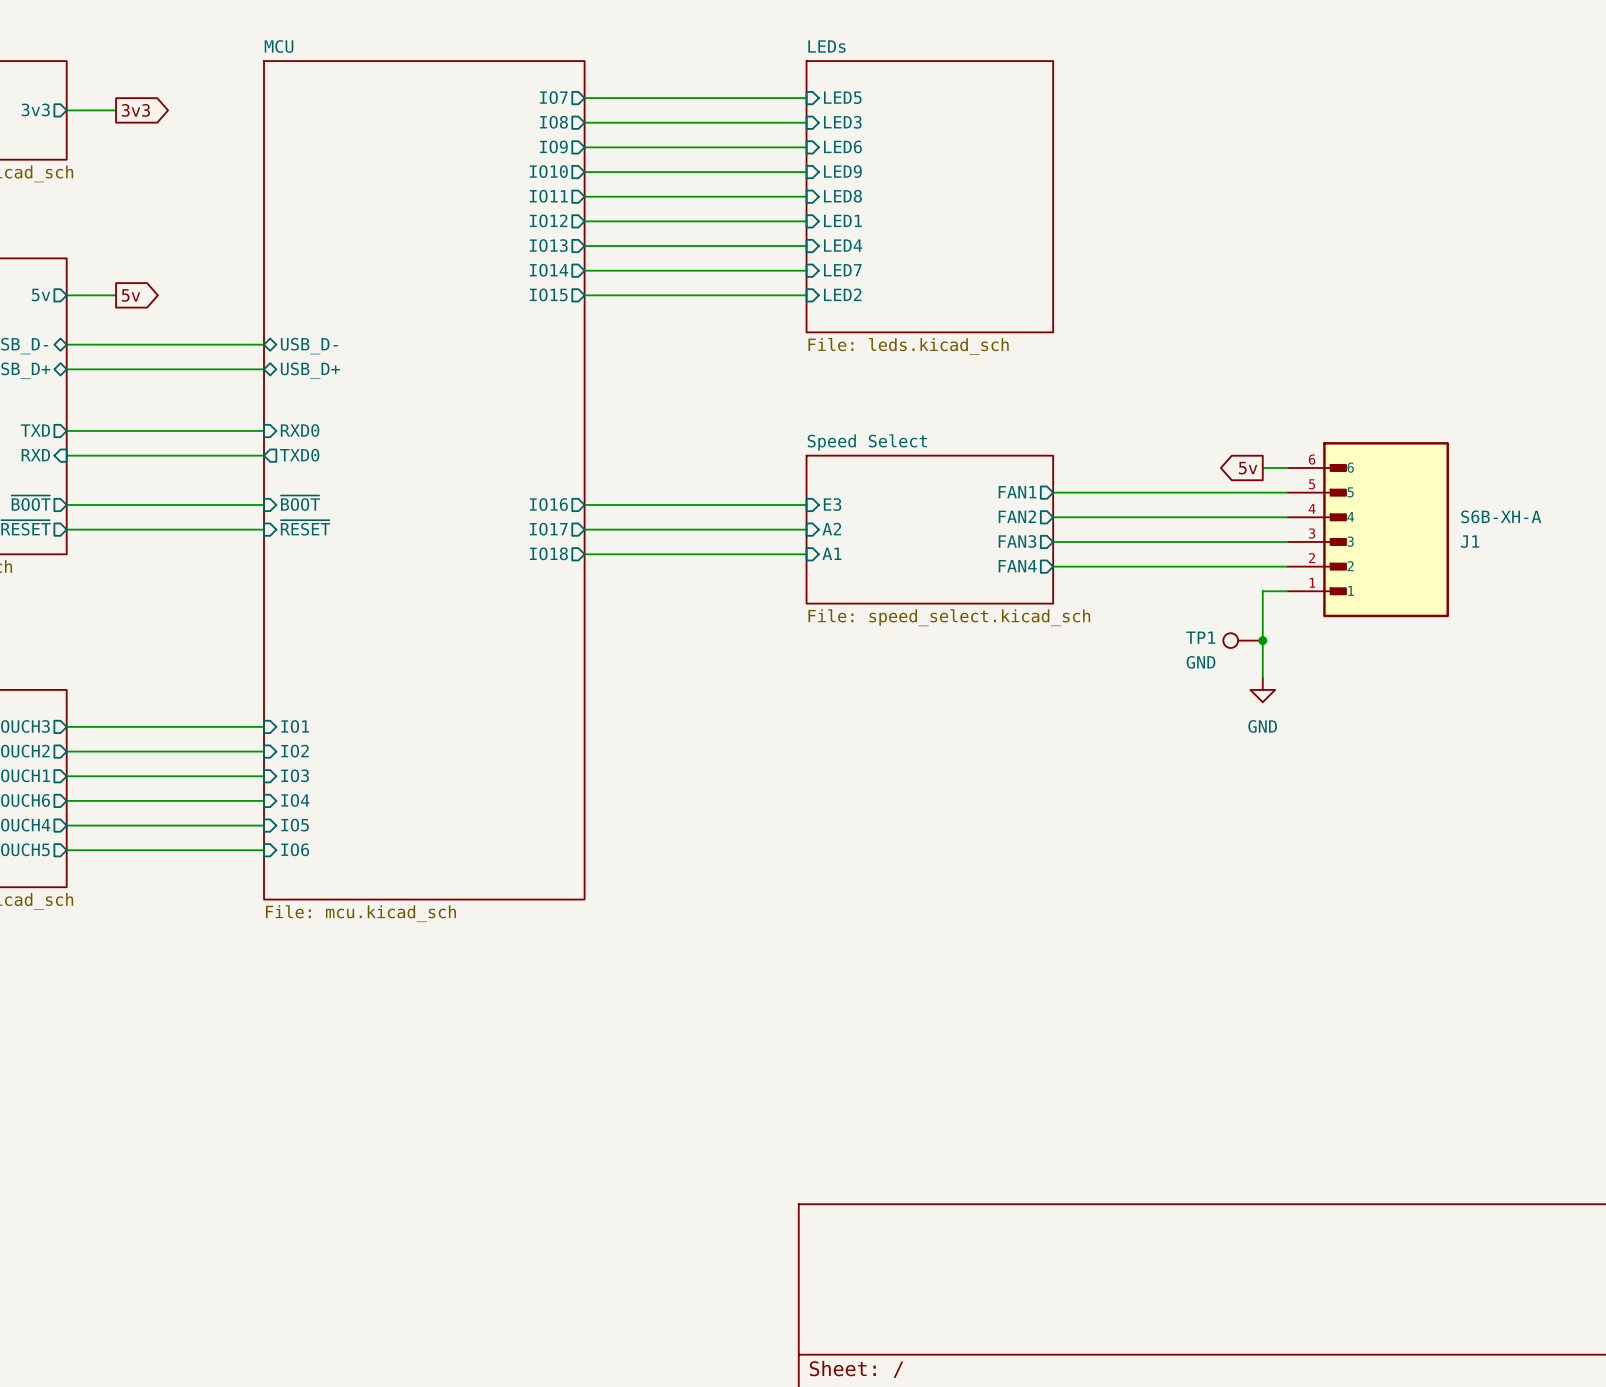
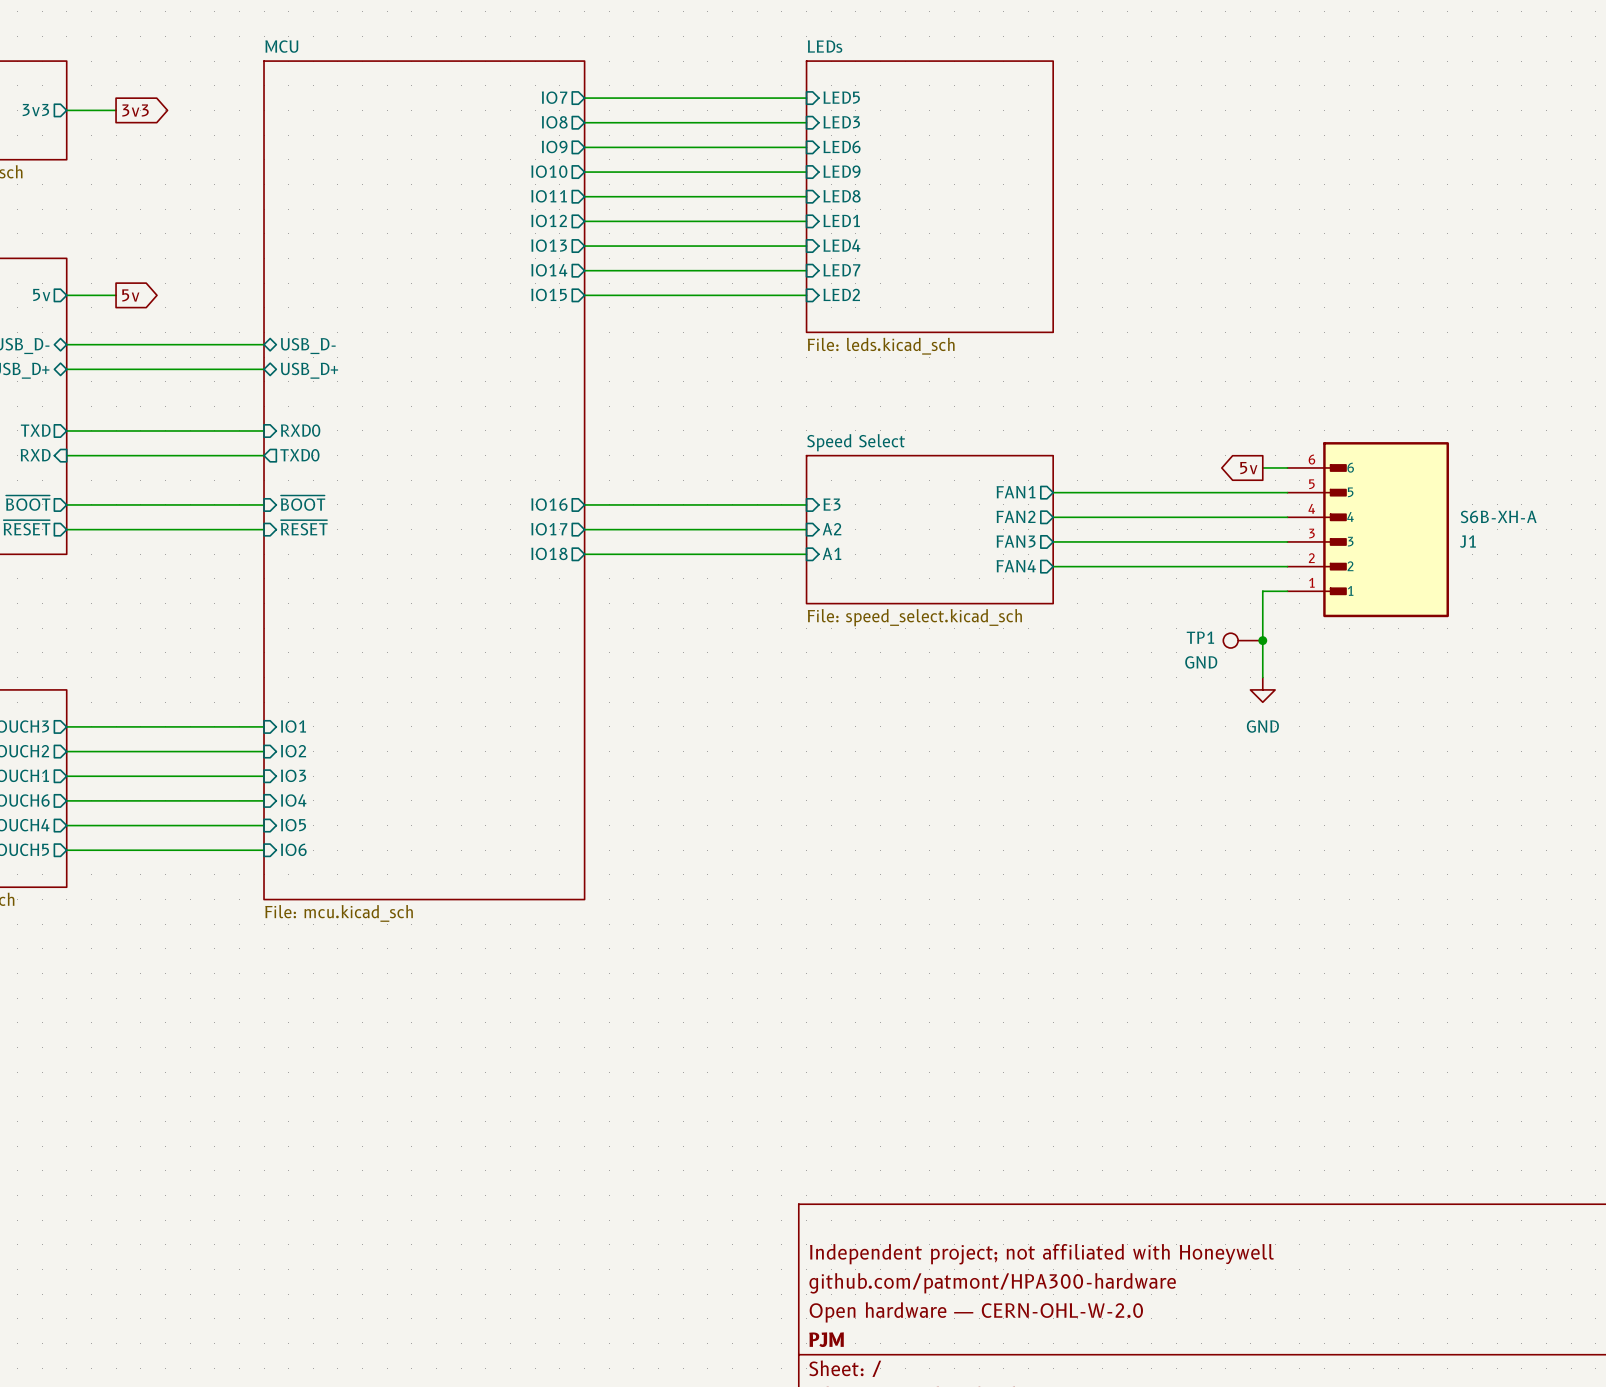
title block: none -> Independent project; not affiliated with Honeywell (1041, 1254)
title block: none -> github.com/patmont/HPA300-hardware (992, 1283)
title block: none -> Open hardware — CERN-OHL-W-2.0 (976, 1312)
title block: none -> PJM (826, 1339)

